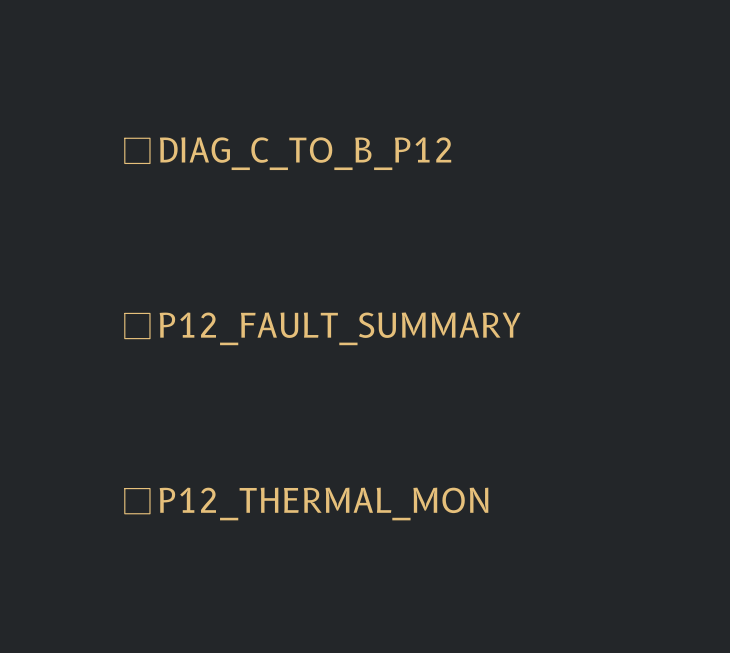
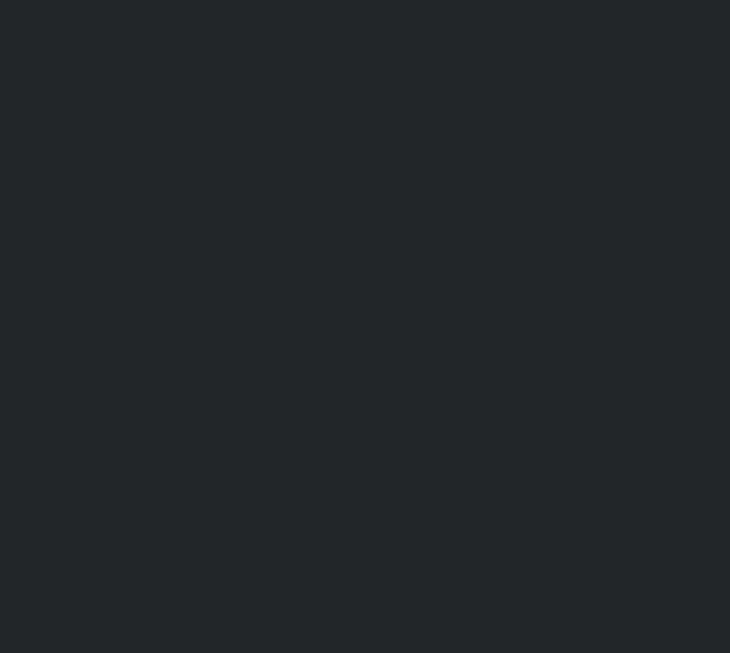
hierarchical label: DIAG_C_TO_B_P12 (305, 153) -> none
hierarchical label: P12_FAULT_SUMMARY (340, 328) -> none
hierarchical label: P12_THERMAL_MON (323, 503) -> none

